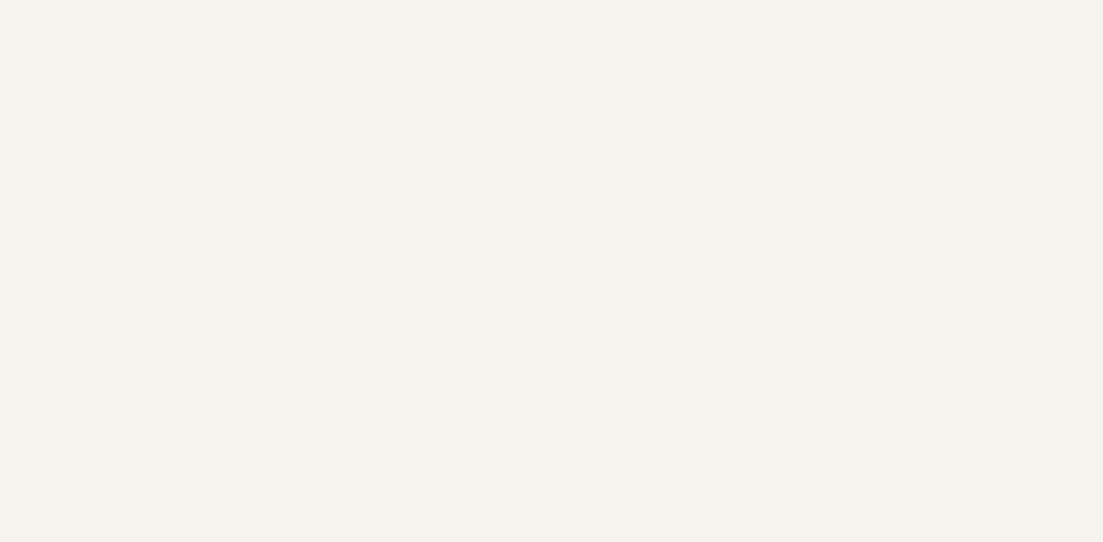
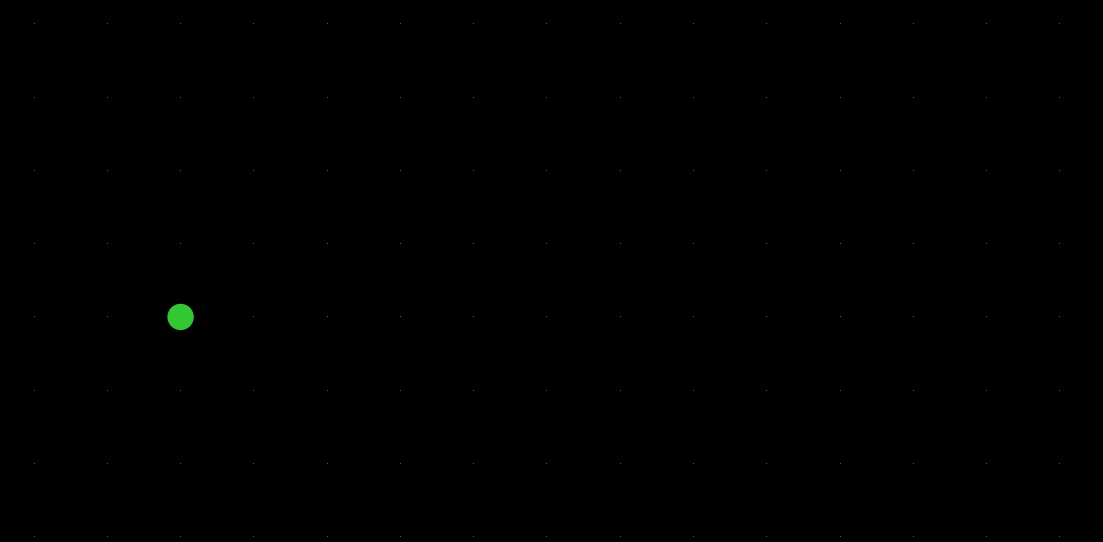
junction: none -> (180, 316)

